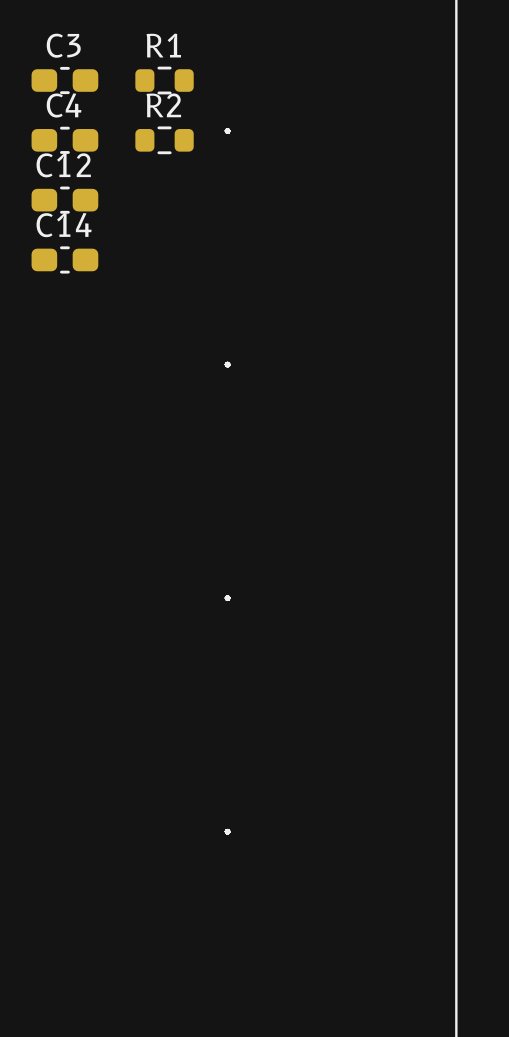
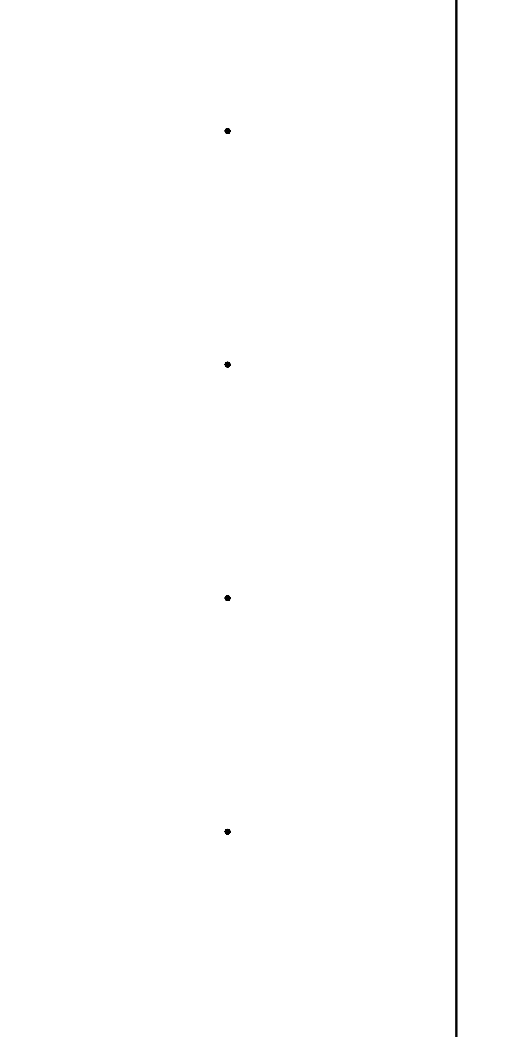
C3: (64, 80) -> none
R1: (164, 80) -> none
C4: (64, 140) -> none
R2: (164, 140) -> none
C12: (64, 200) -> none
C14: (64, 259) -> none

